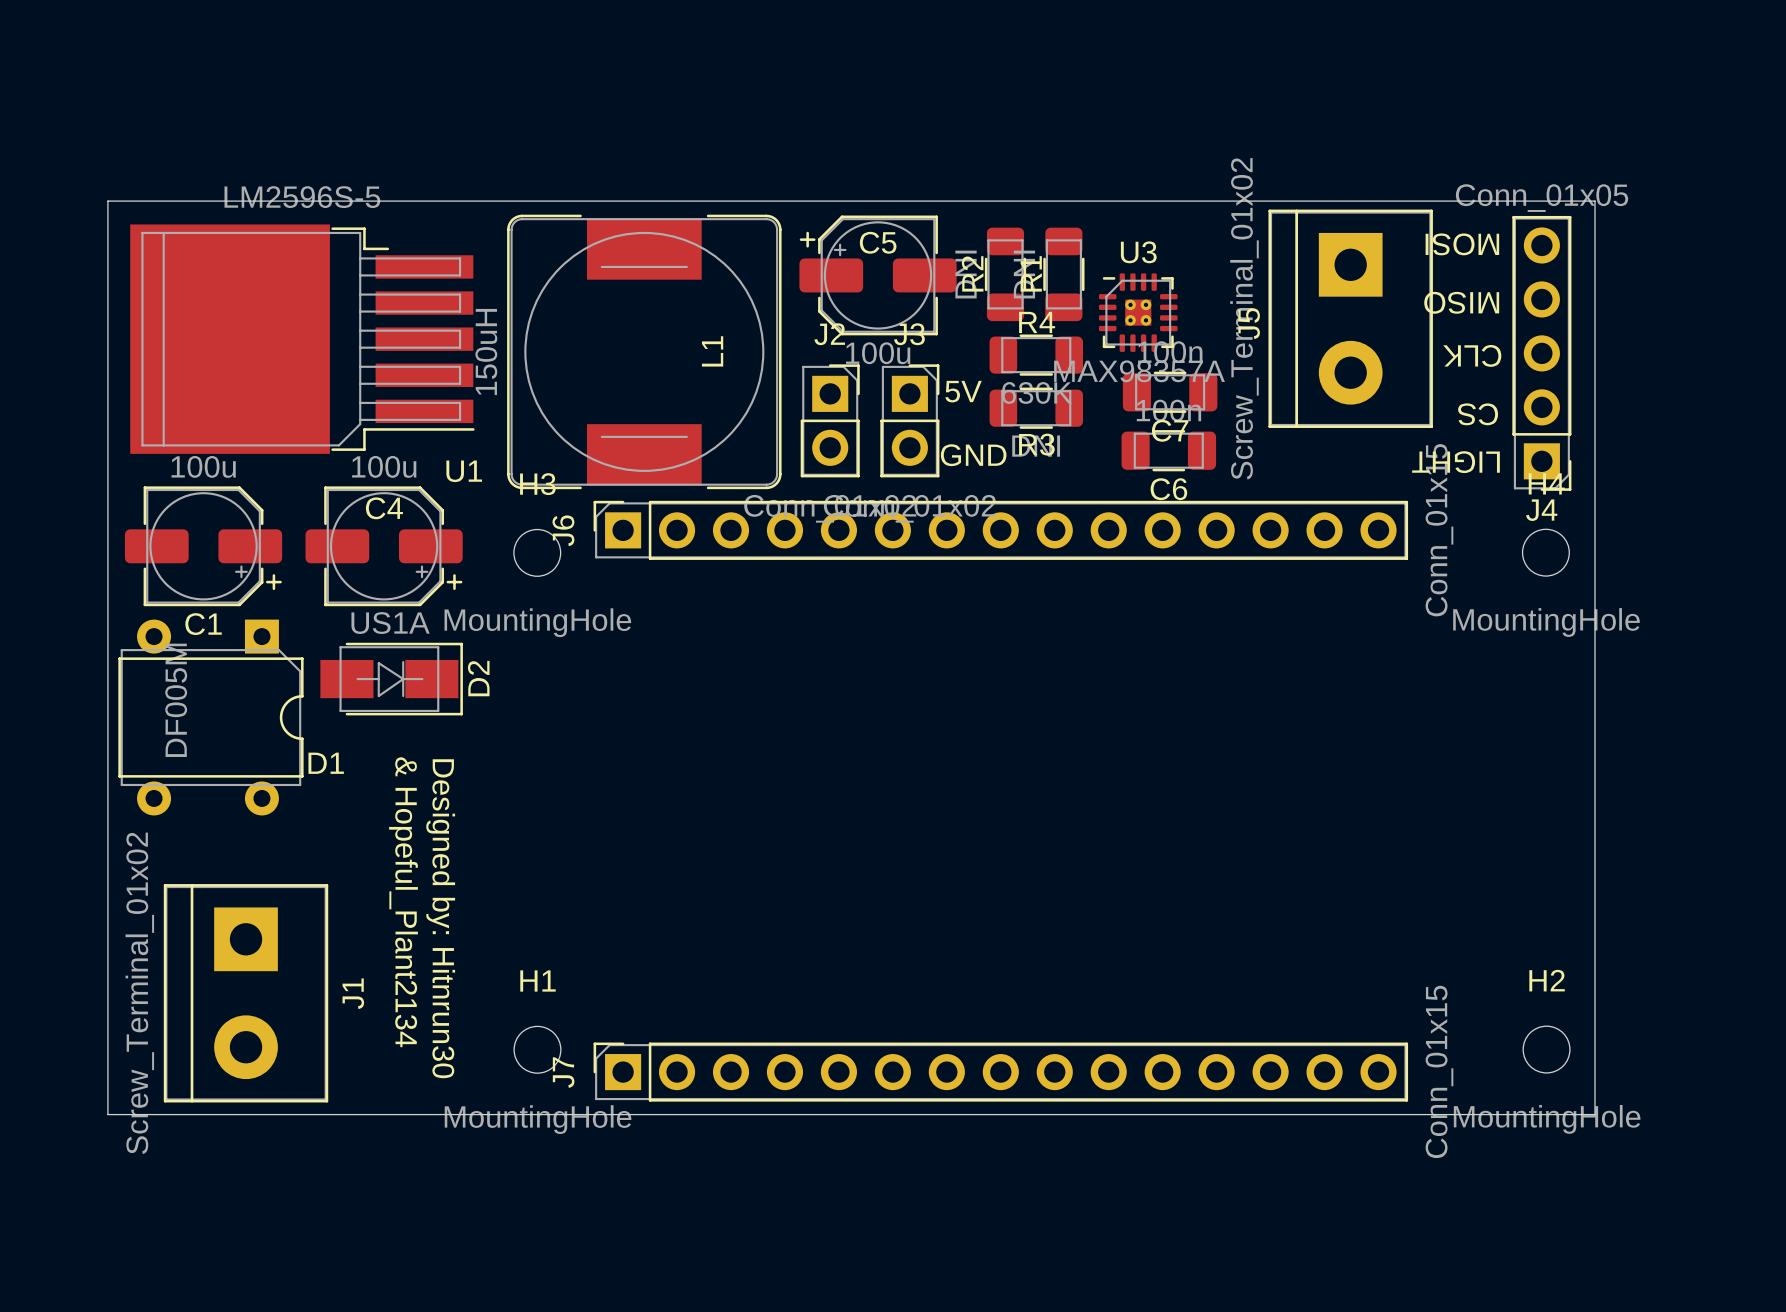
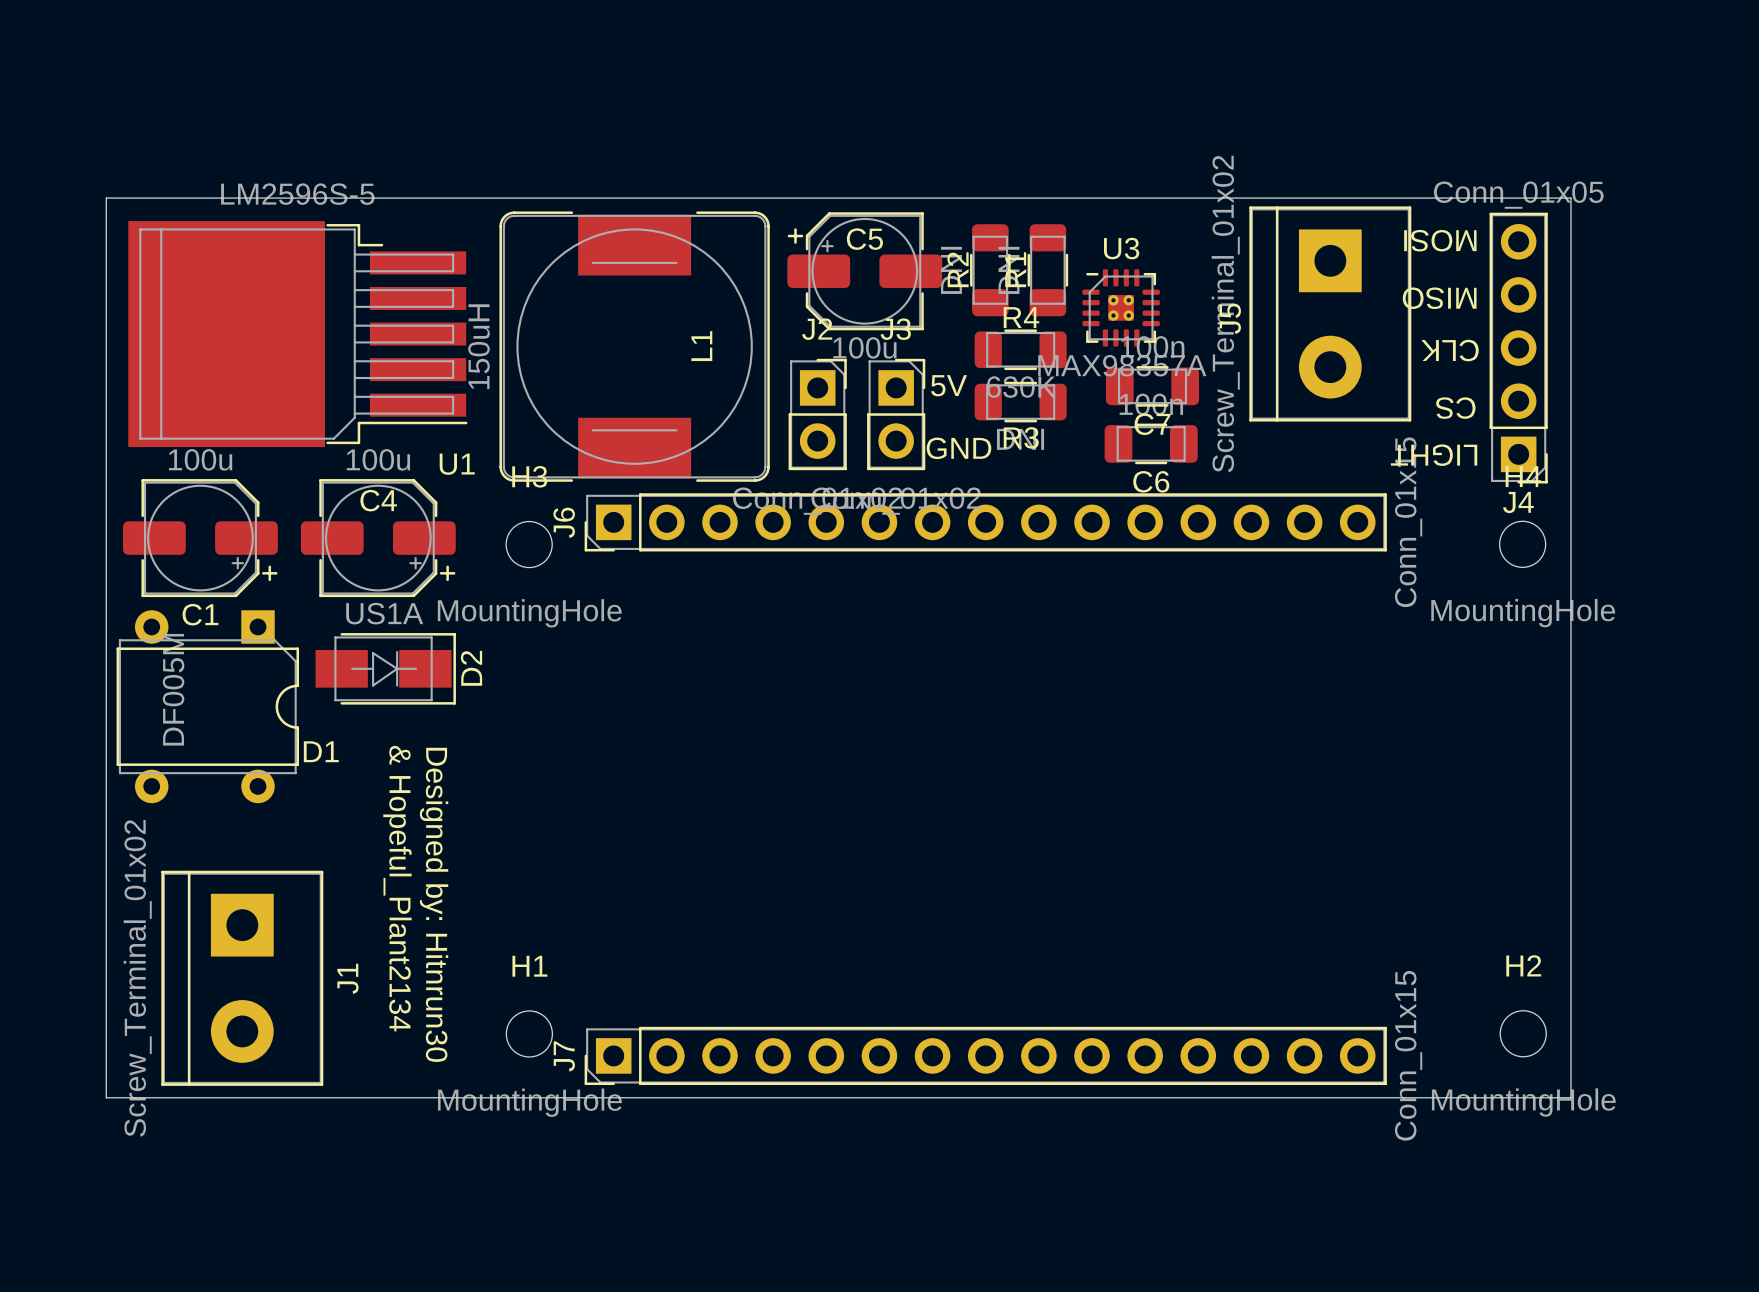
J6 footprint: [593, 500, 1409, 560] -> [584, 493, 1387, 552]
J7 footprint: [593, 1042, 1409, 1102] -> [584, 1026, 1387, 1086]

